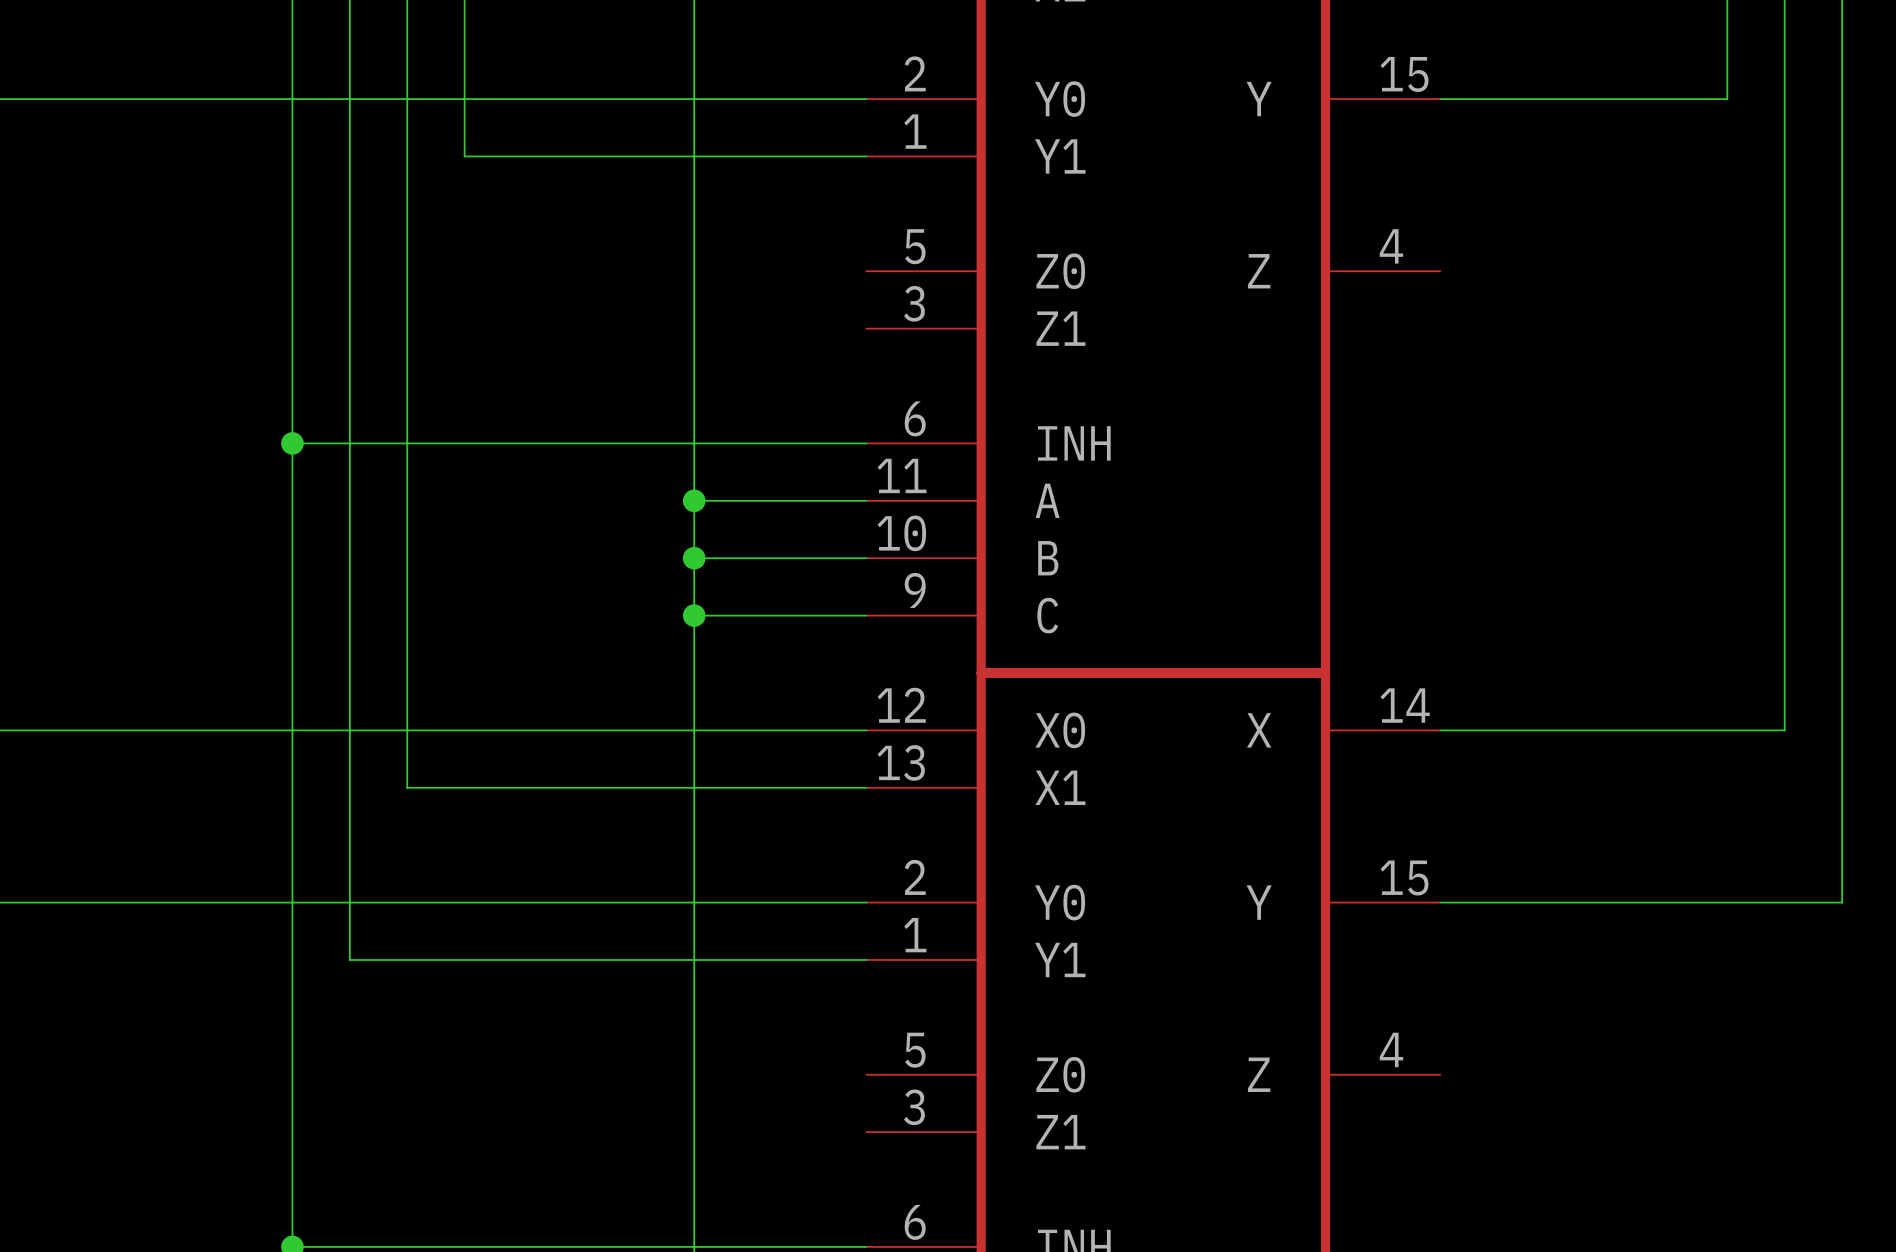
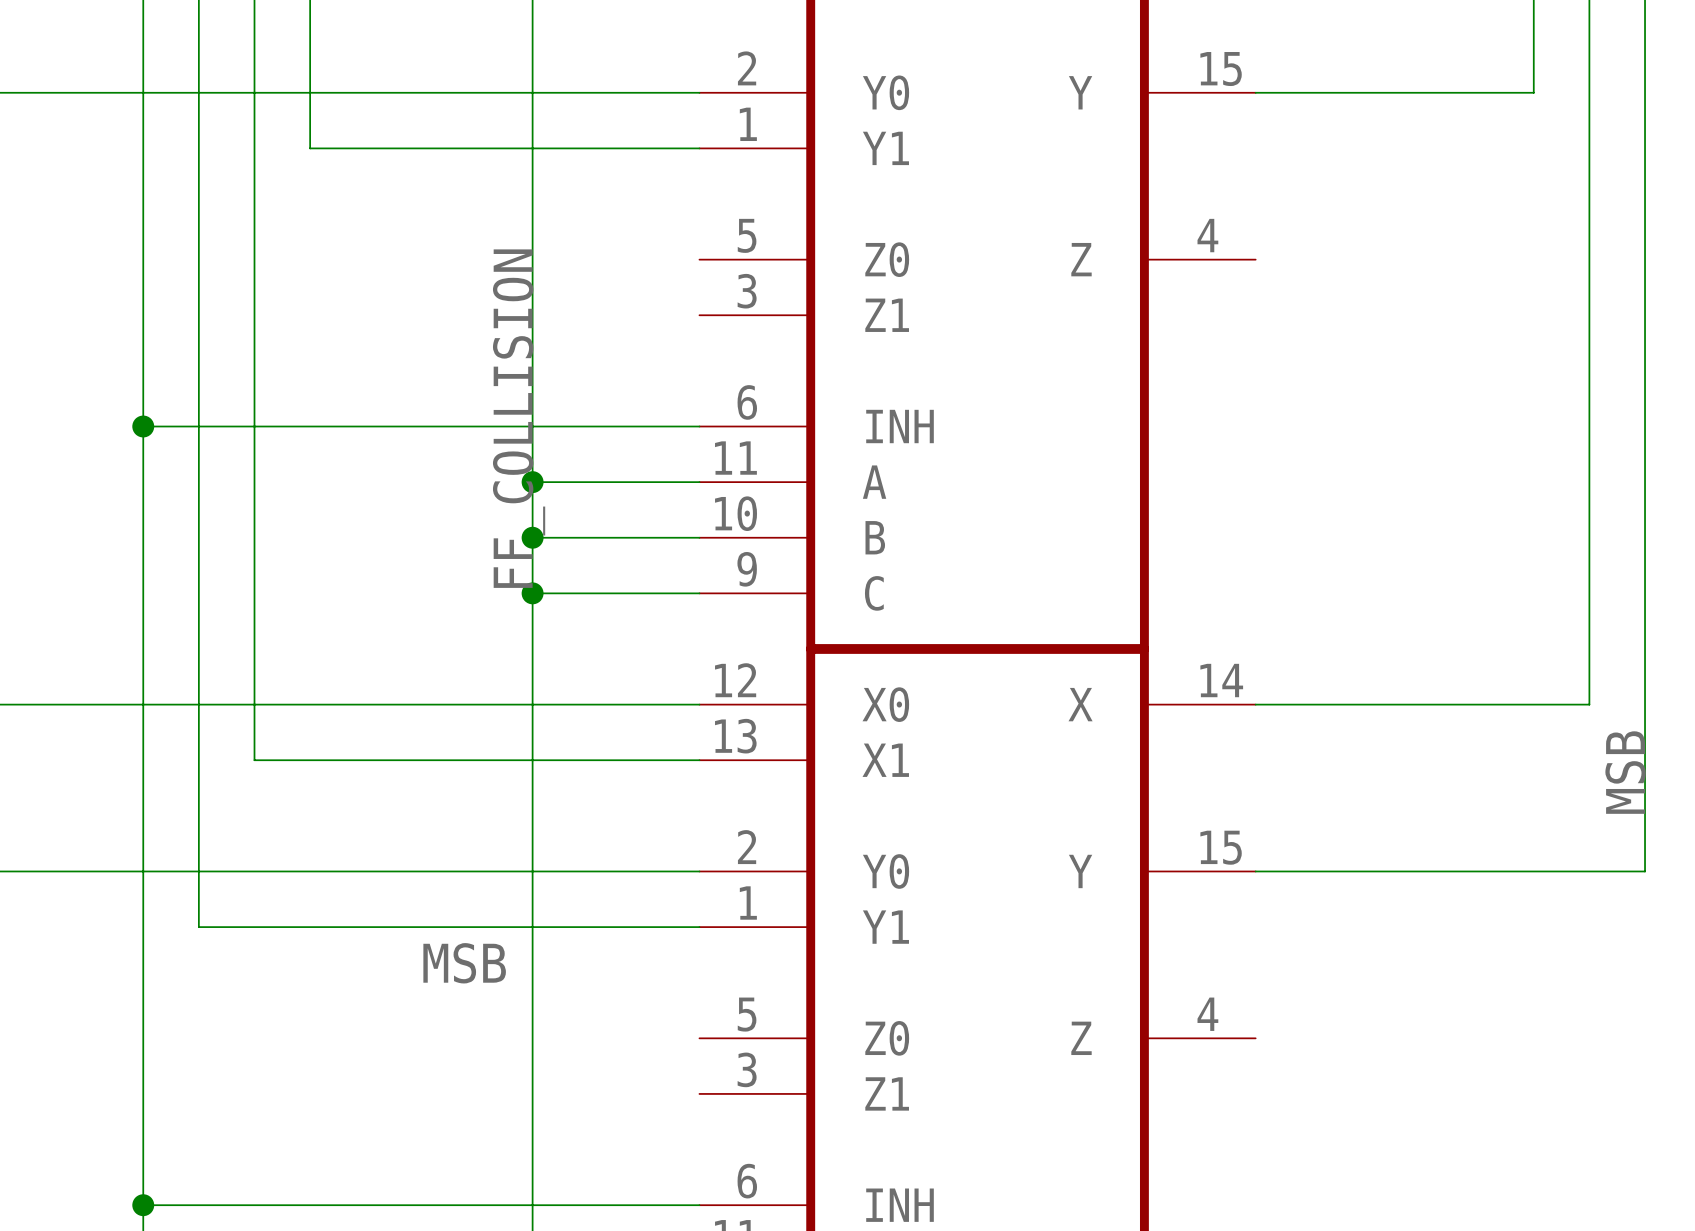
label: none -> FF_COLLISION (519, 418)
label: none -> MSB (1625, 772)
label: none -> MSB (464, 963)

